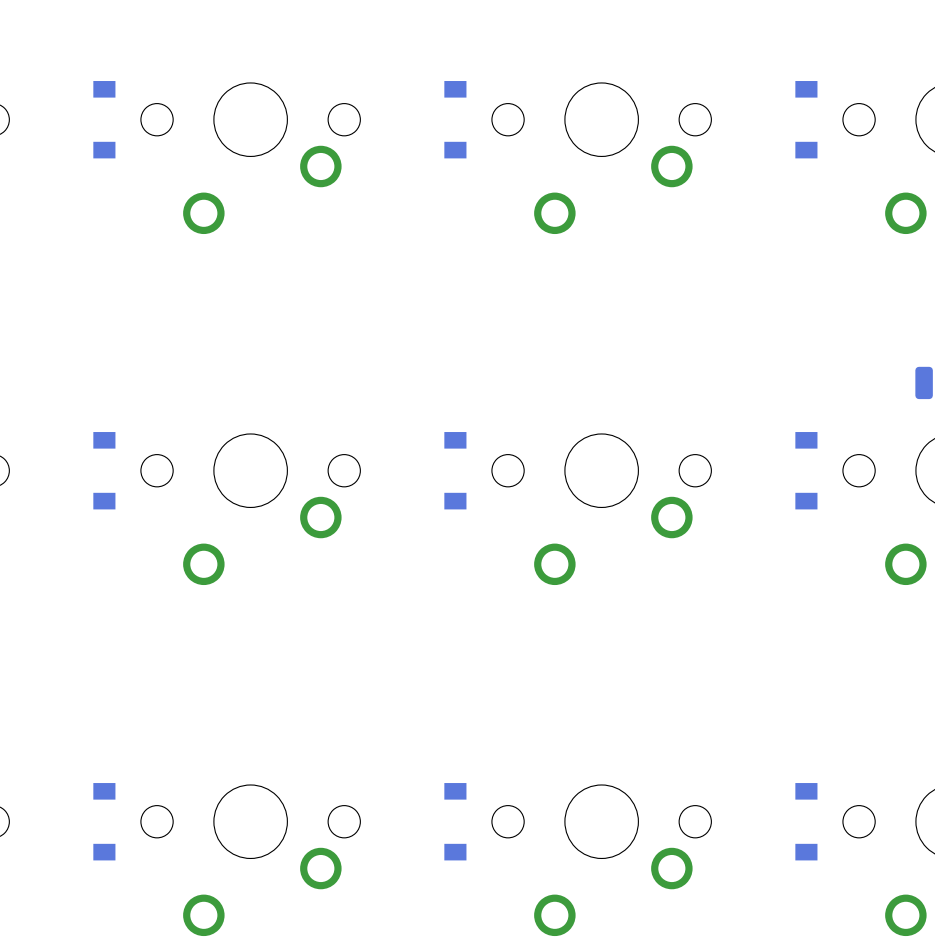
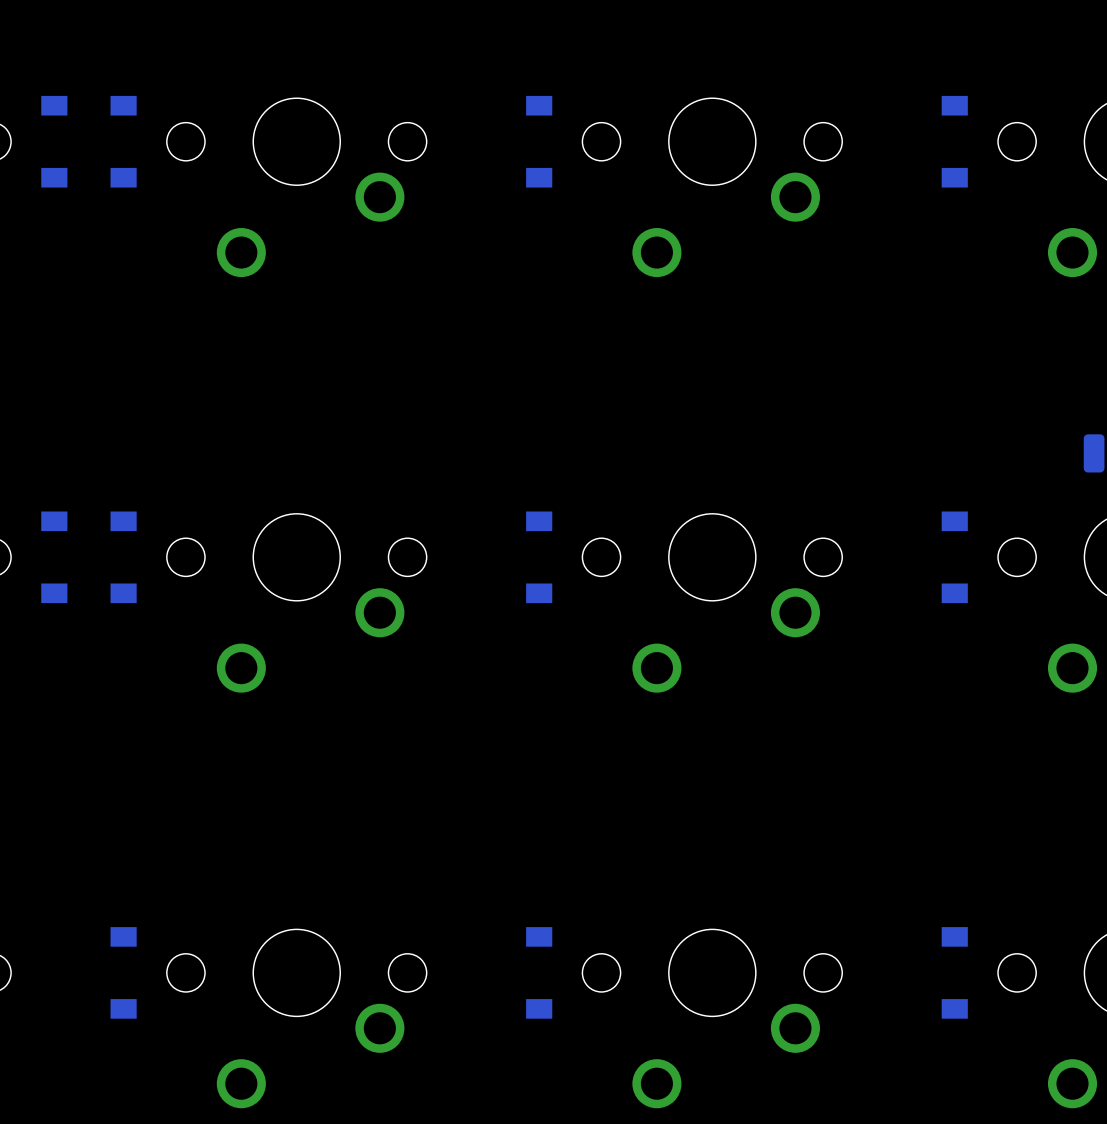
part: none -> (54, 141)
part: none -> (54, 557)

